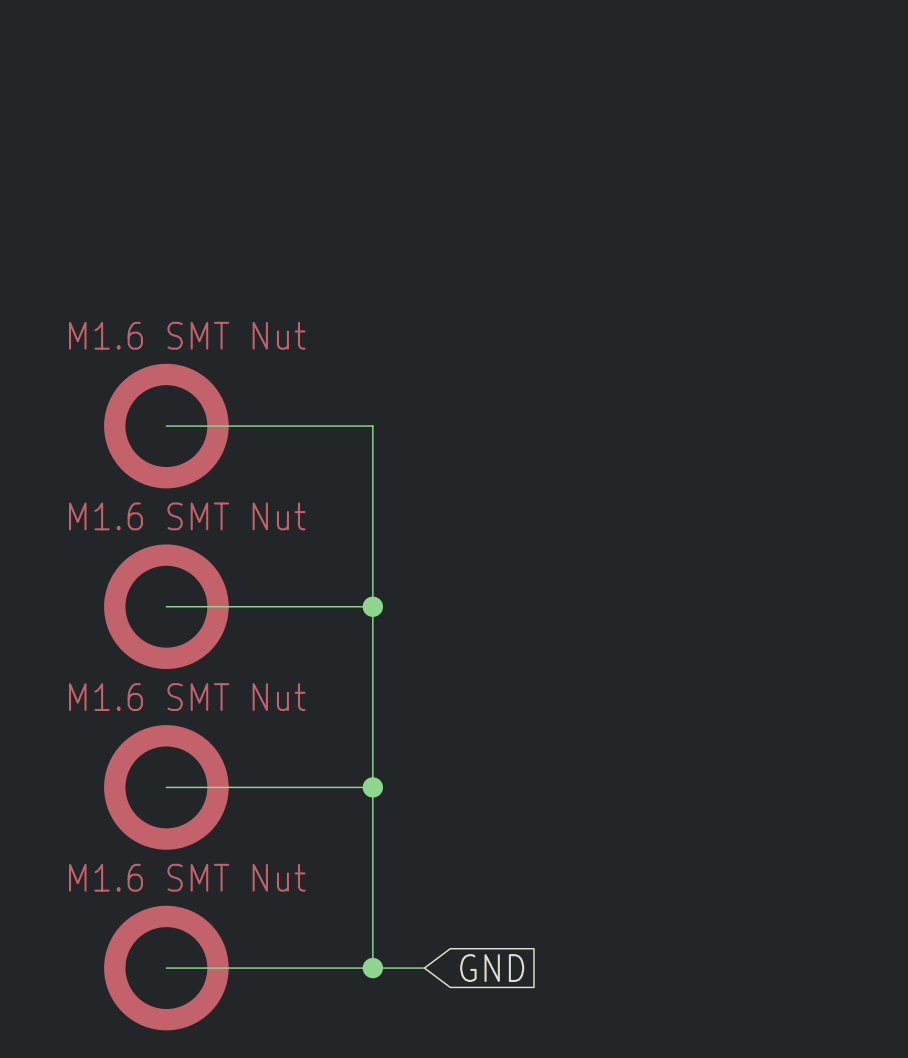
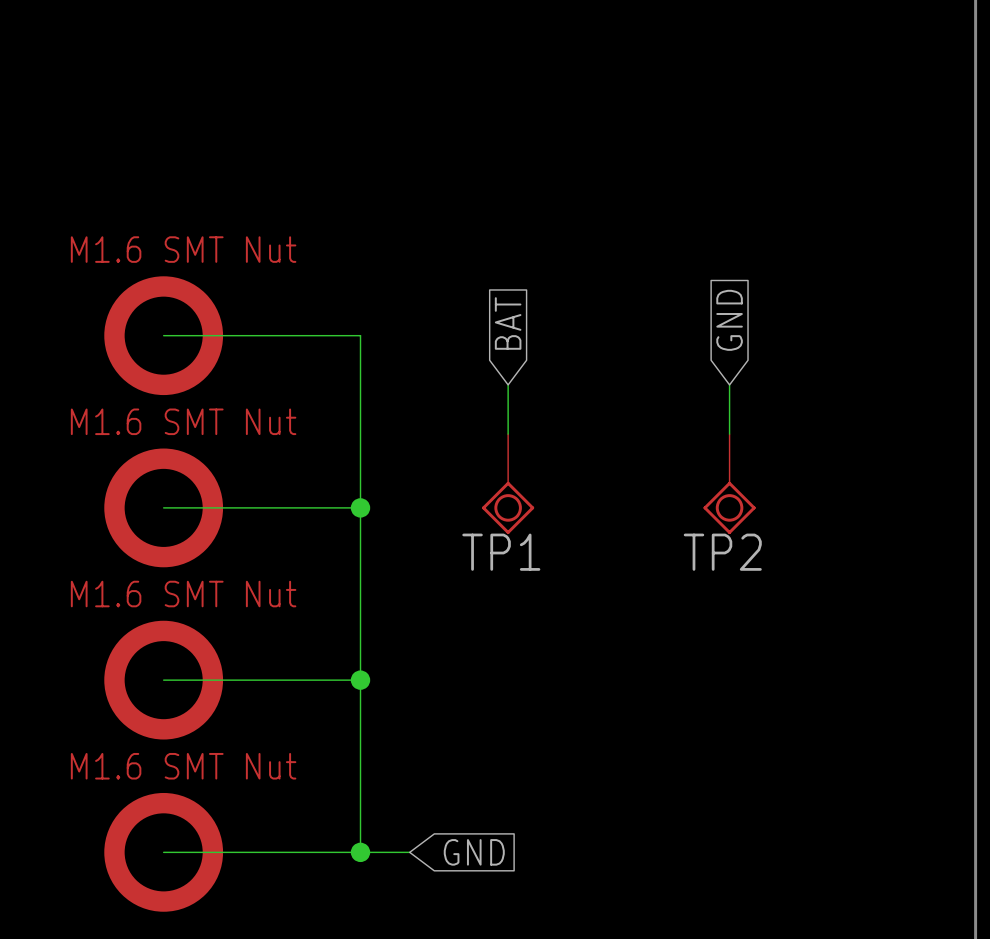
global label: none -> GND (729, 320)
global label: none -> BAT (508, 323)
wire: none -> (508, 384) (508, 434)
wire: none -> (729, 384) (729, 434)
TP1: none -> (508, 484)
TP2: none -> (729, 484)

